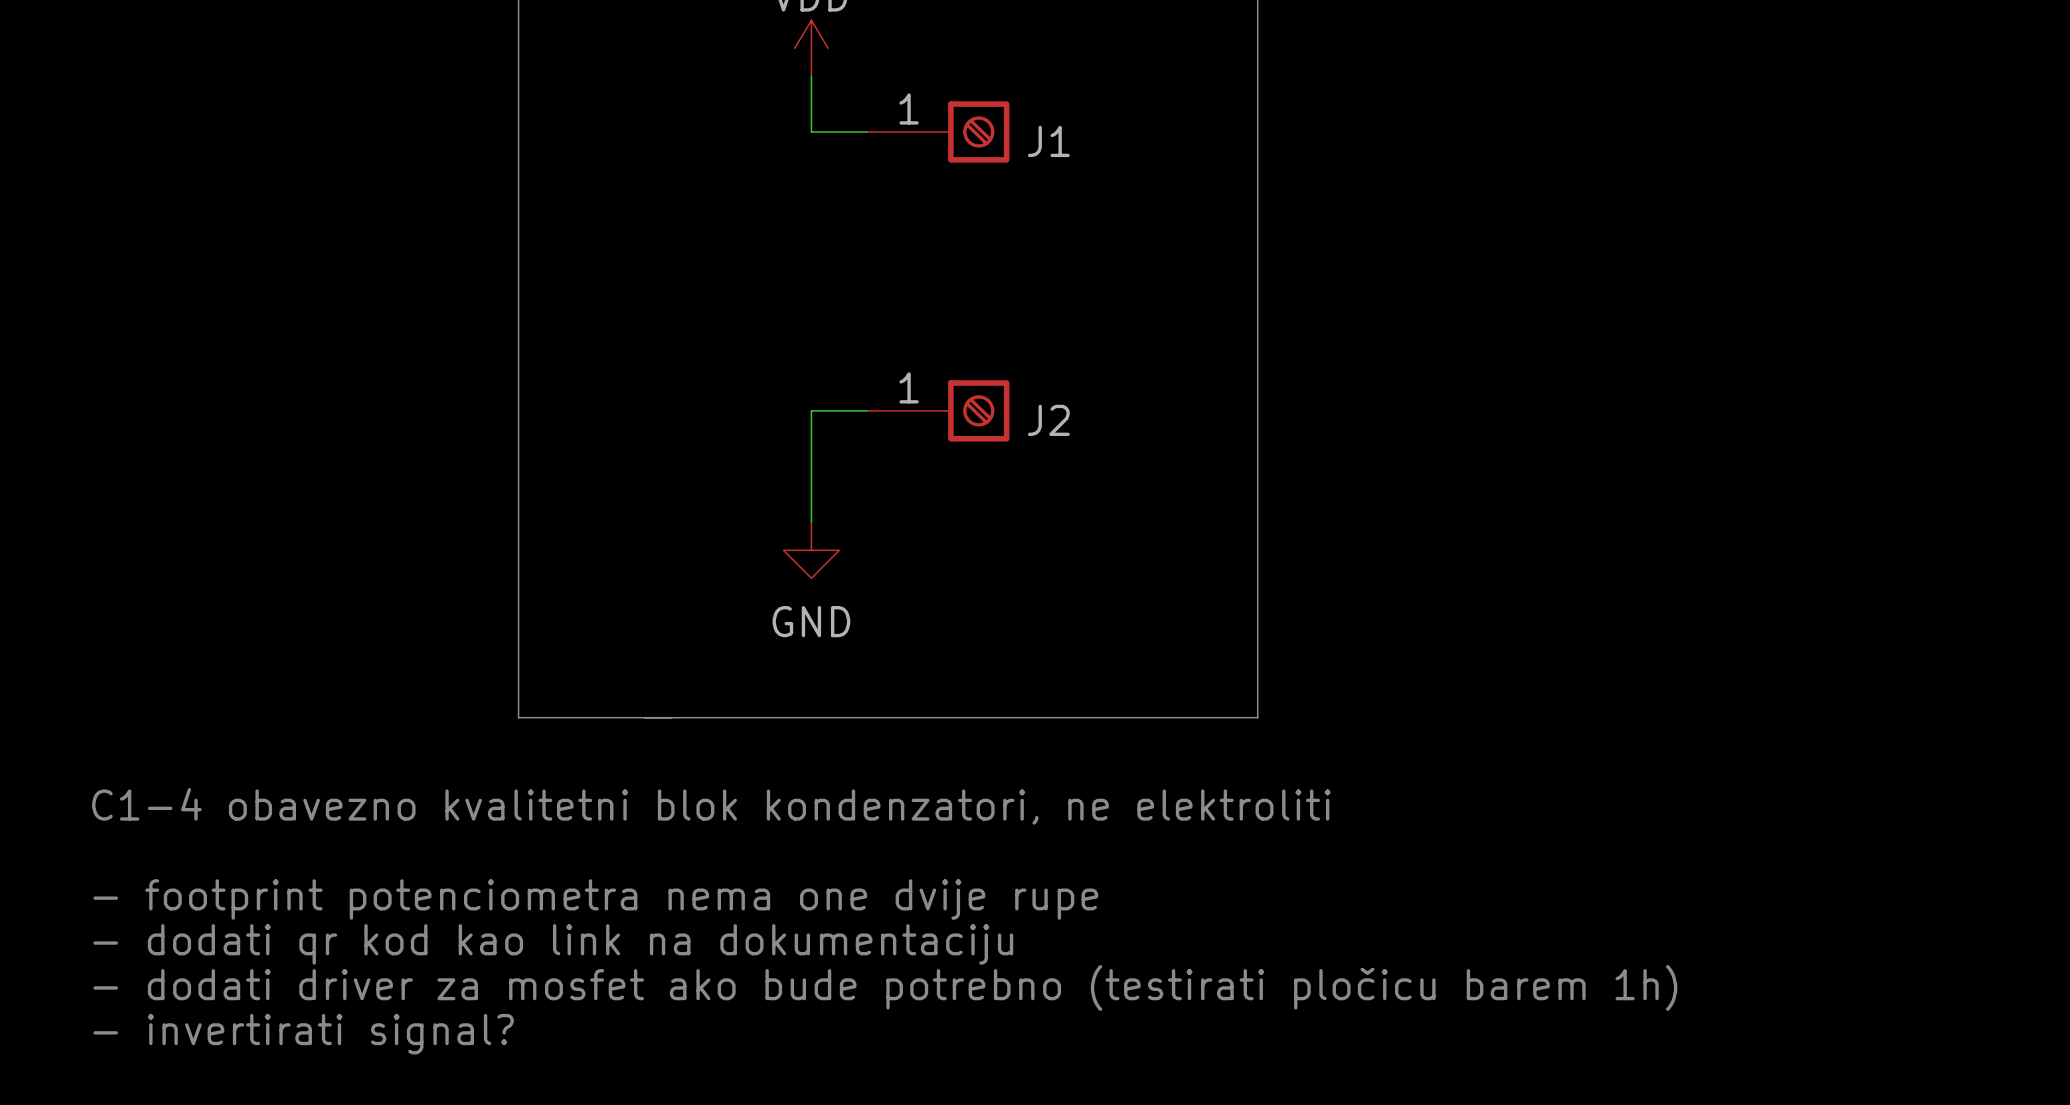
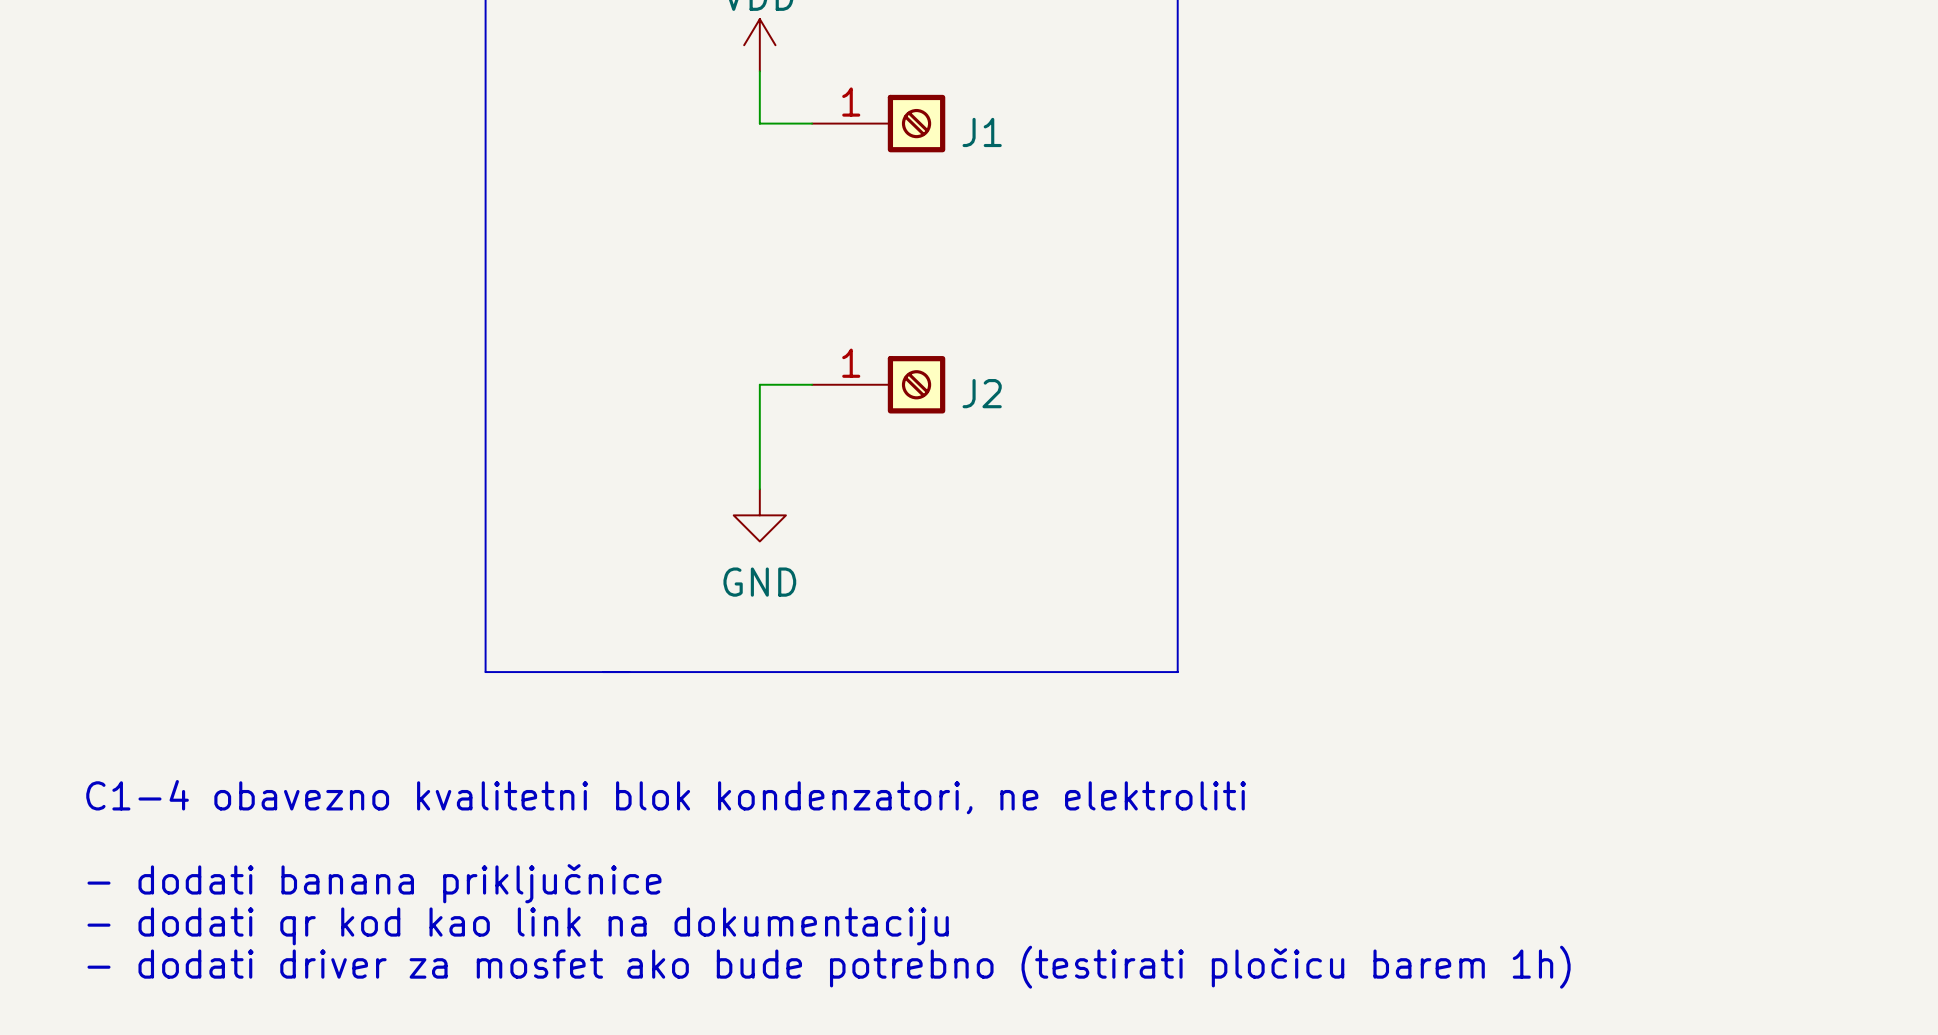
text position: C1-4 obavezno kvalitetni blok kondenzatori, ne elektroliti (711, 806) -> C1-4 obavezno kvalitetni blok kondenzatori, ne elektroliti (666, 797)
text: - footprint potenciometra nema one dvije rupe (595, 899) -> none
text: - dodati qr kod kao link na dokumentaciju (553, 944) -> - dodati banana priključnice (374, 883)
text: - dodati driver za mosfet ako bude potrebno (testirati pločicu barem 1h) (885, 987) -> - dodati qr kod kao link na dokumentaciju (518, 926)
text: - invertirati signal? (303, 1034) -> - dodati driver za mosfet ako bude potrebno (testirati pločicu barem 1h) (829, 967)

